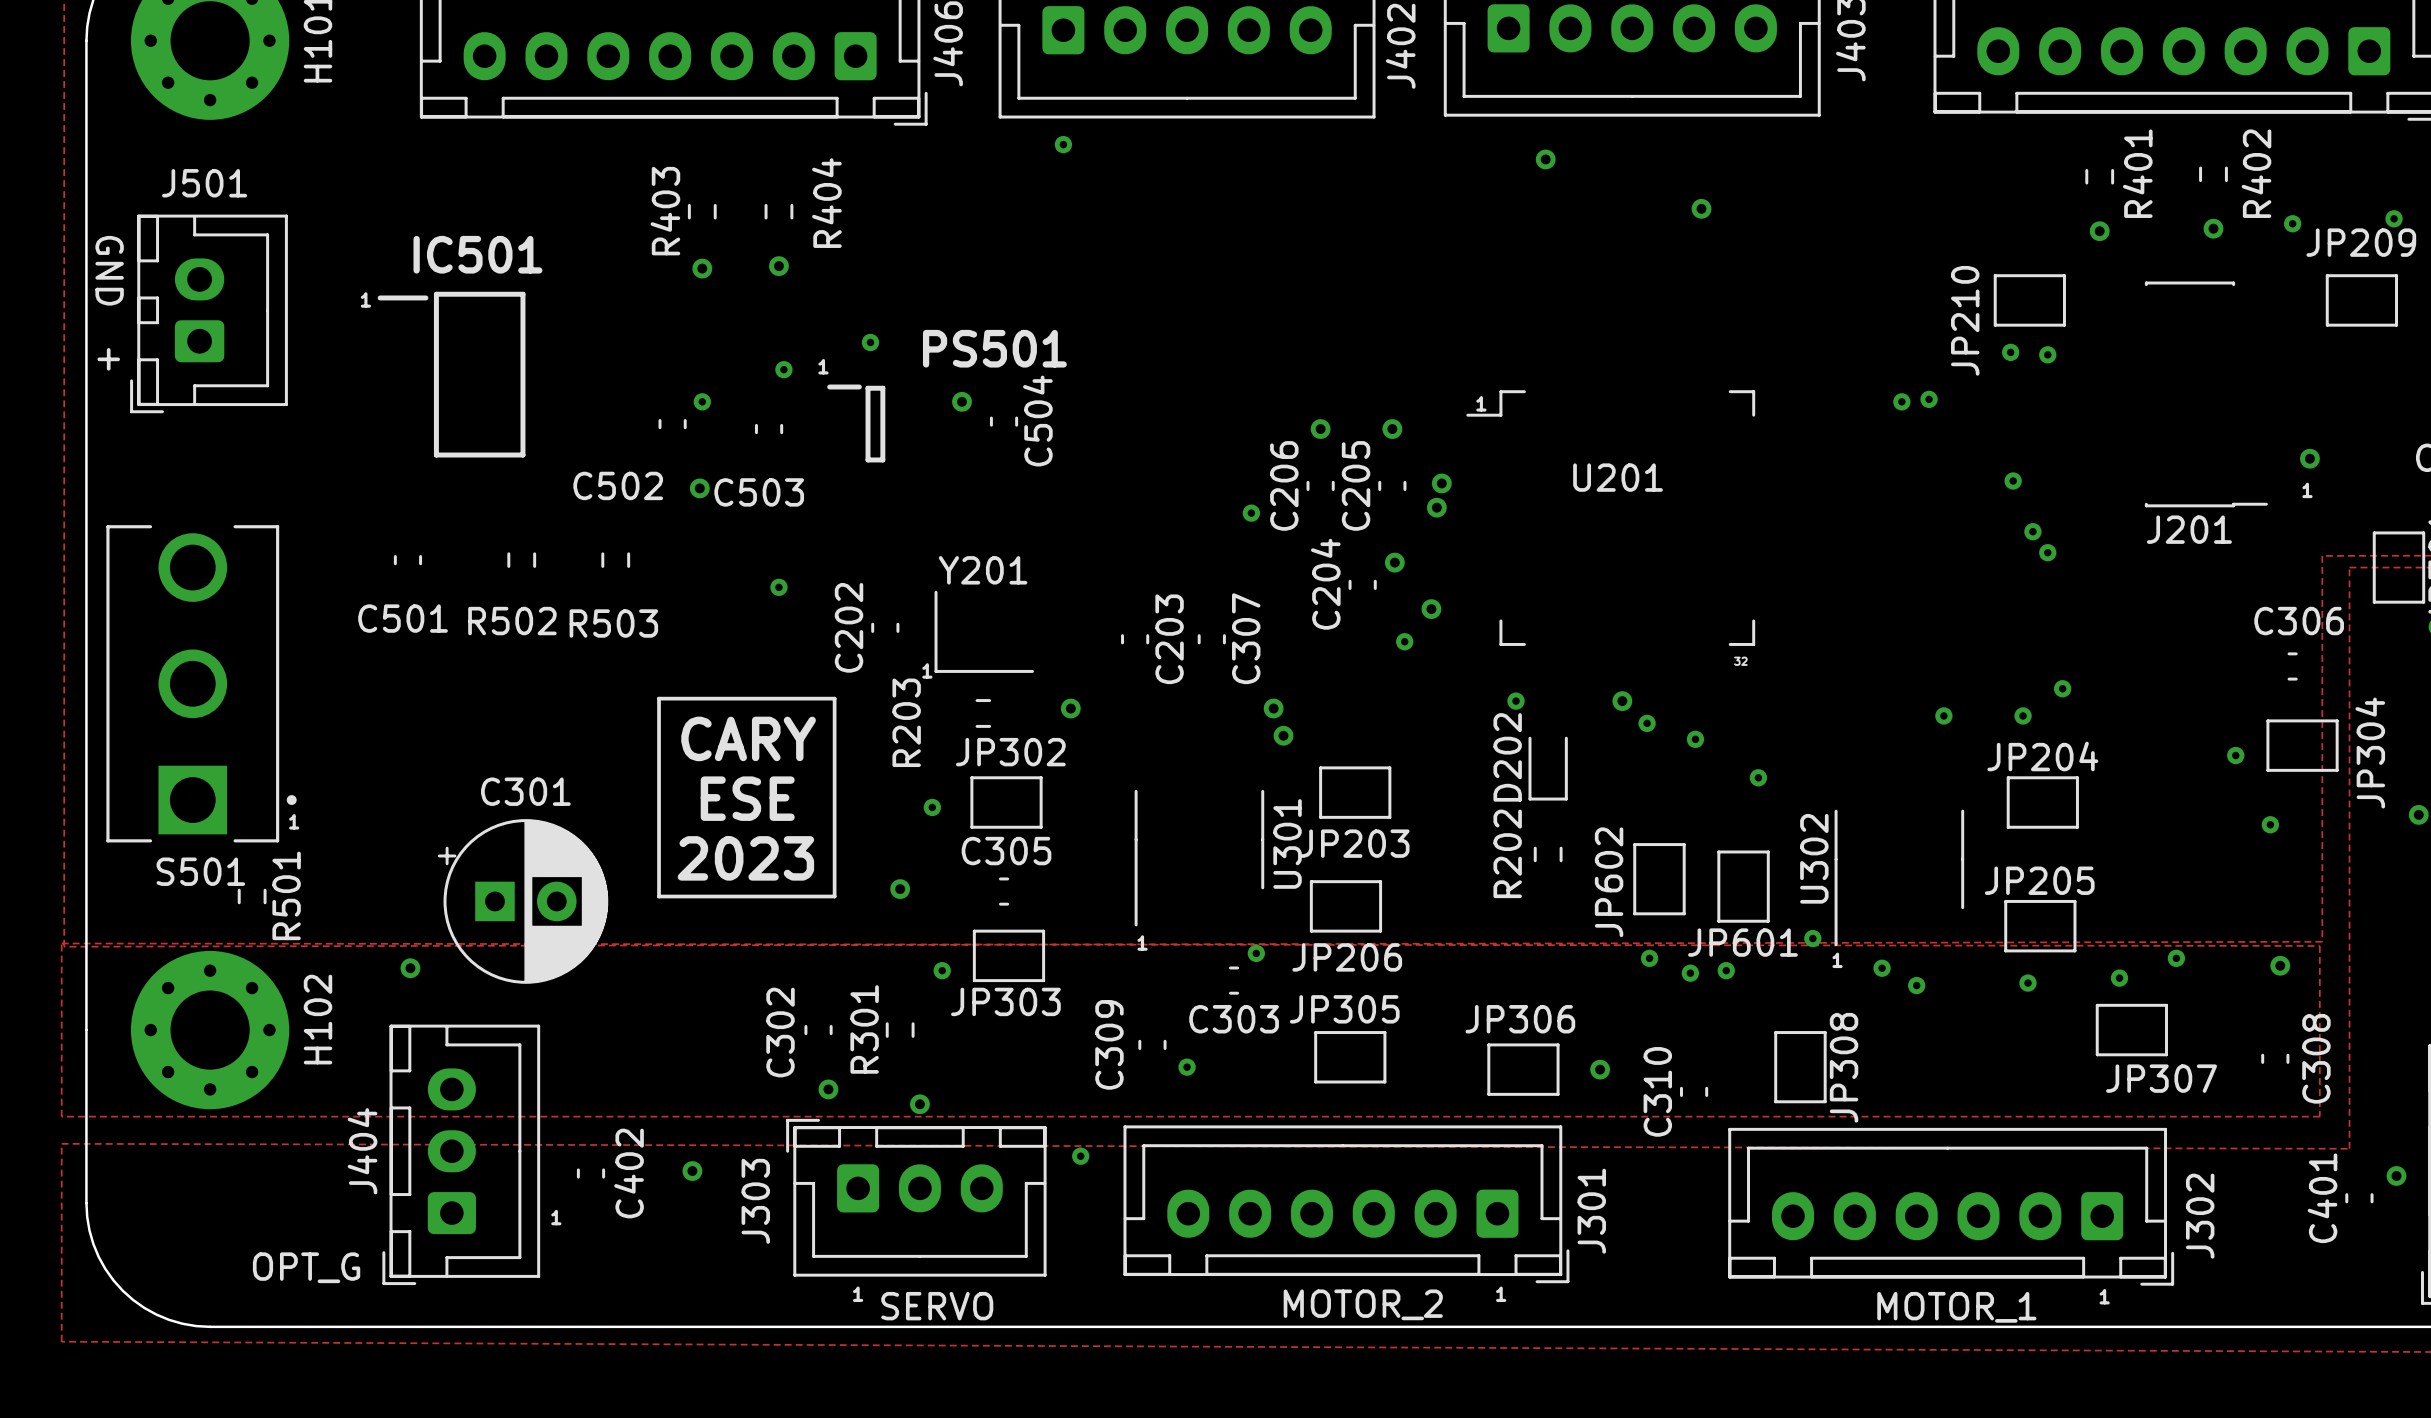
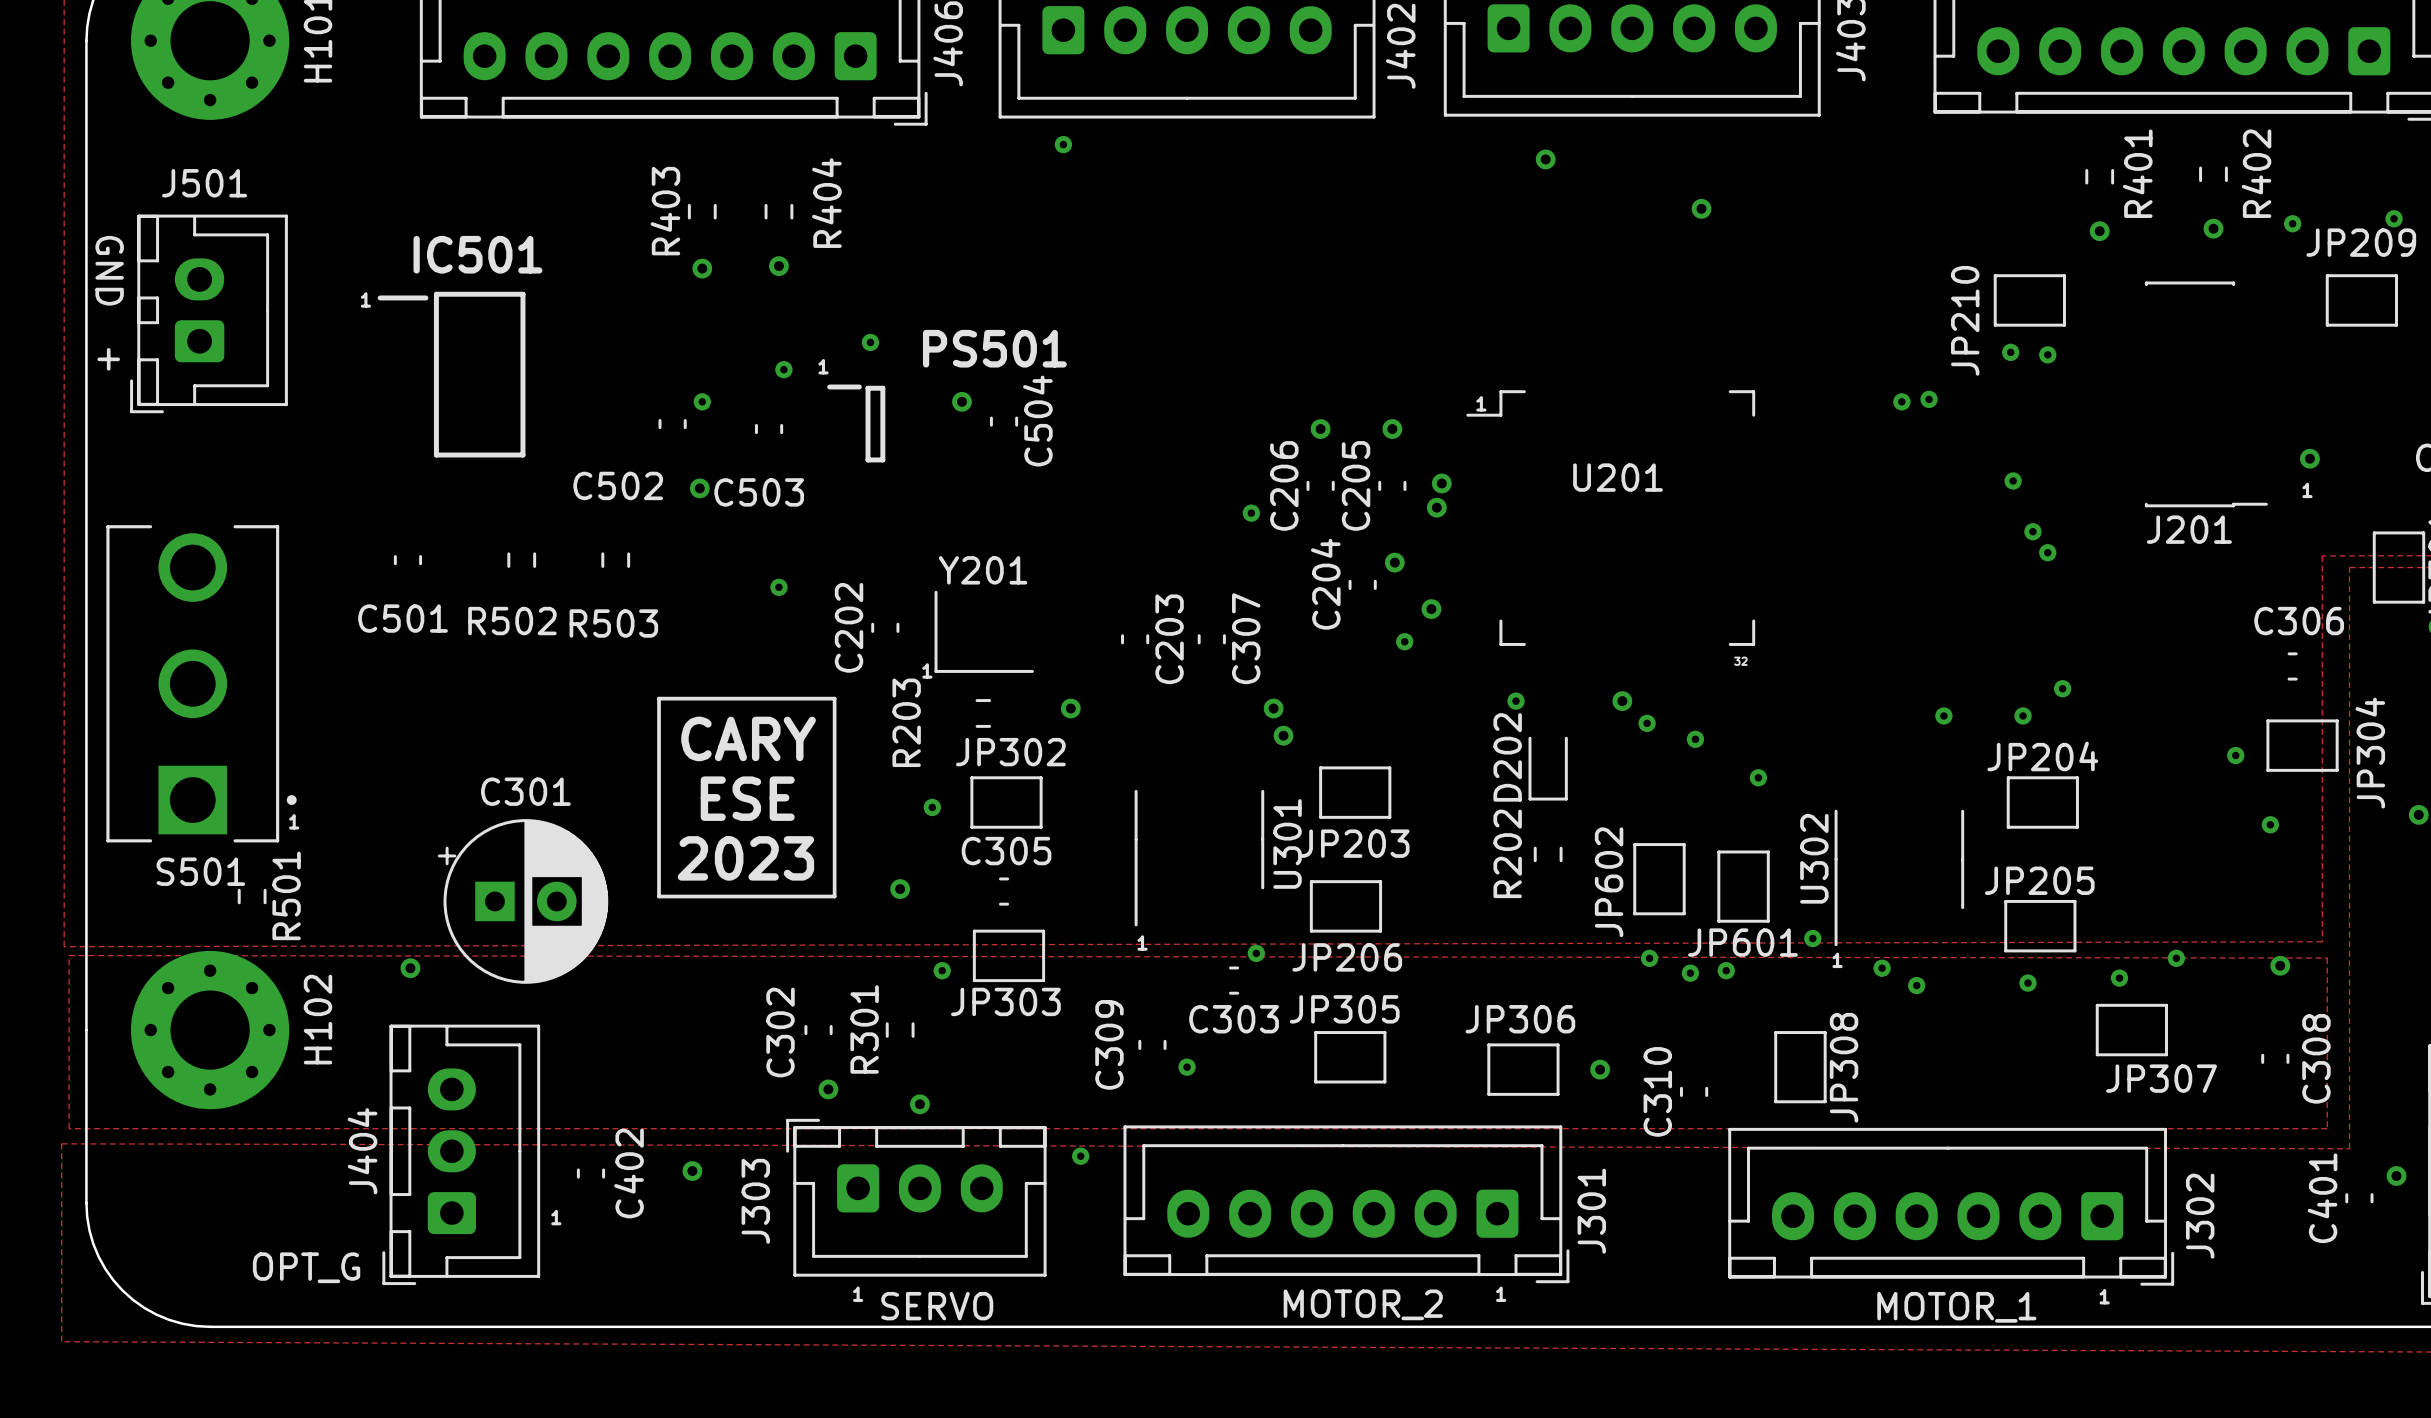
zone outline: (61, 943) (61, 1116) (2319, 1116) (2319, 945) (61, 943) -> (69, 955) (69, 1128) (2327, 1128) (2327, 958) (69, 955)

